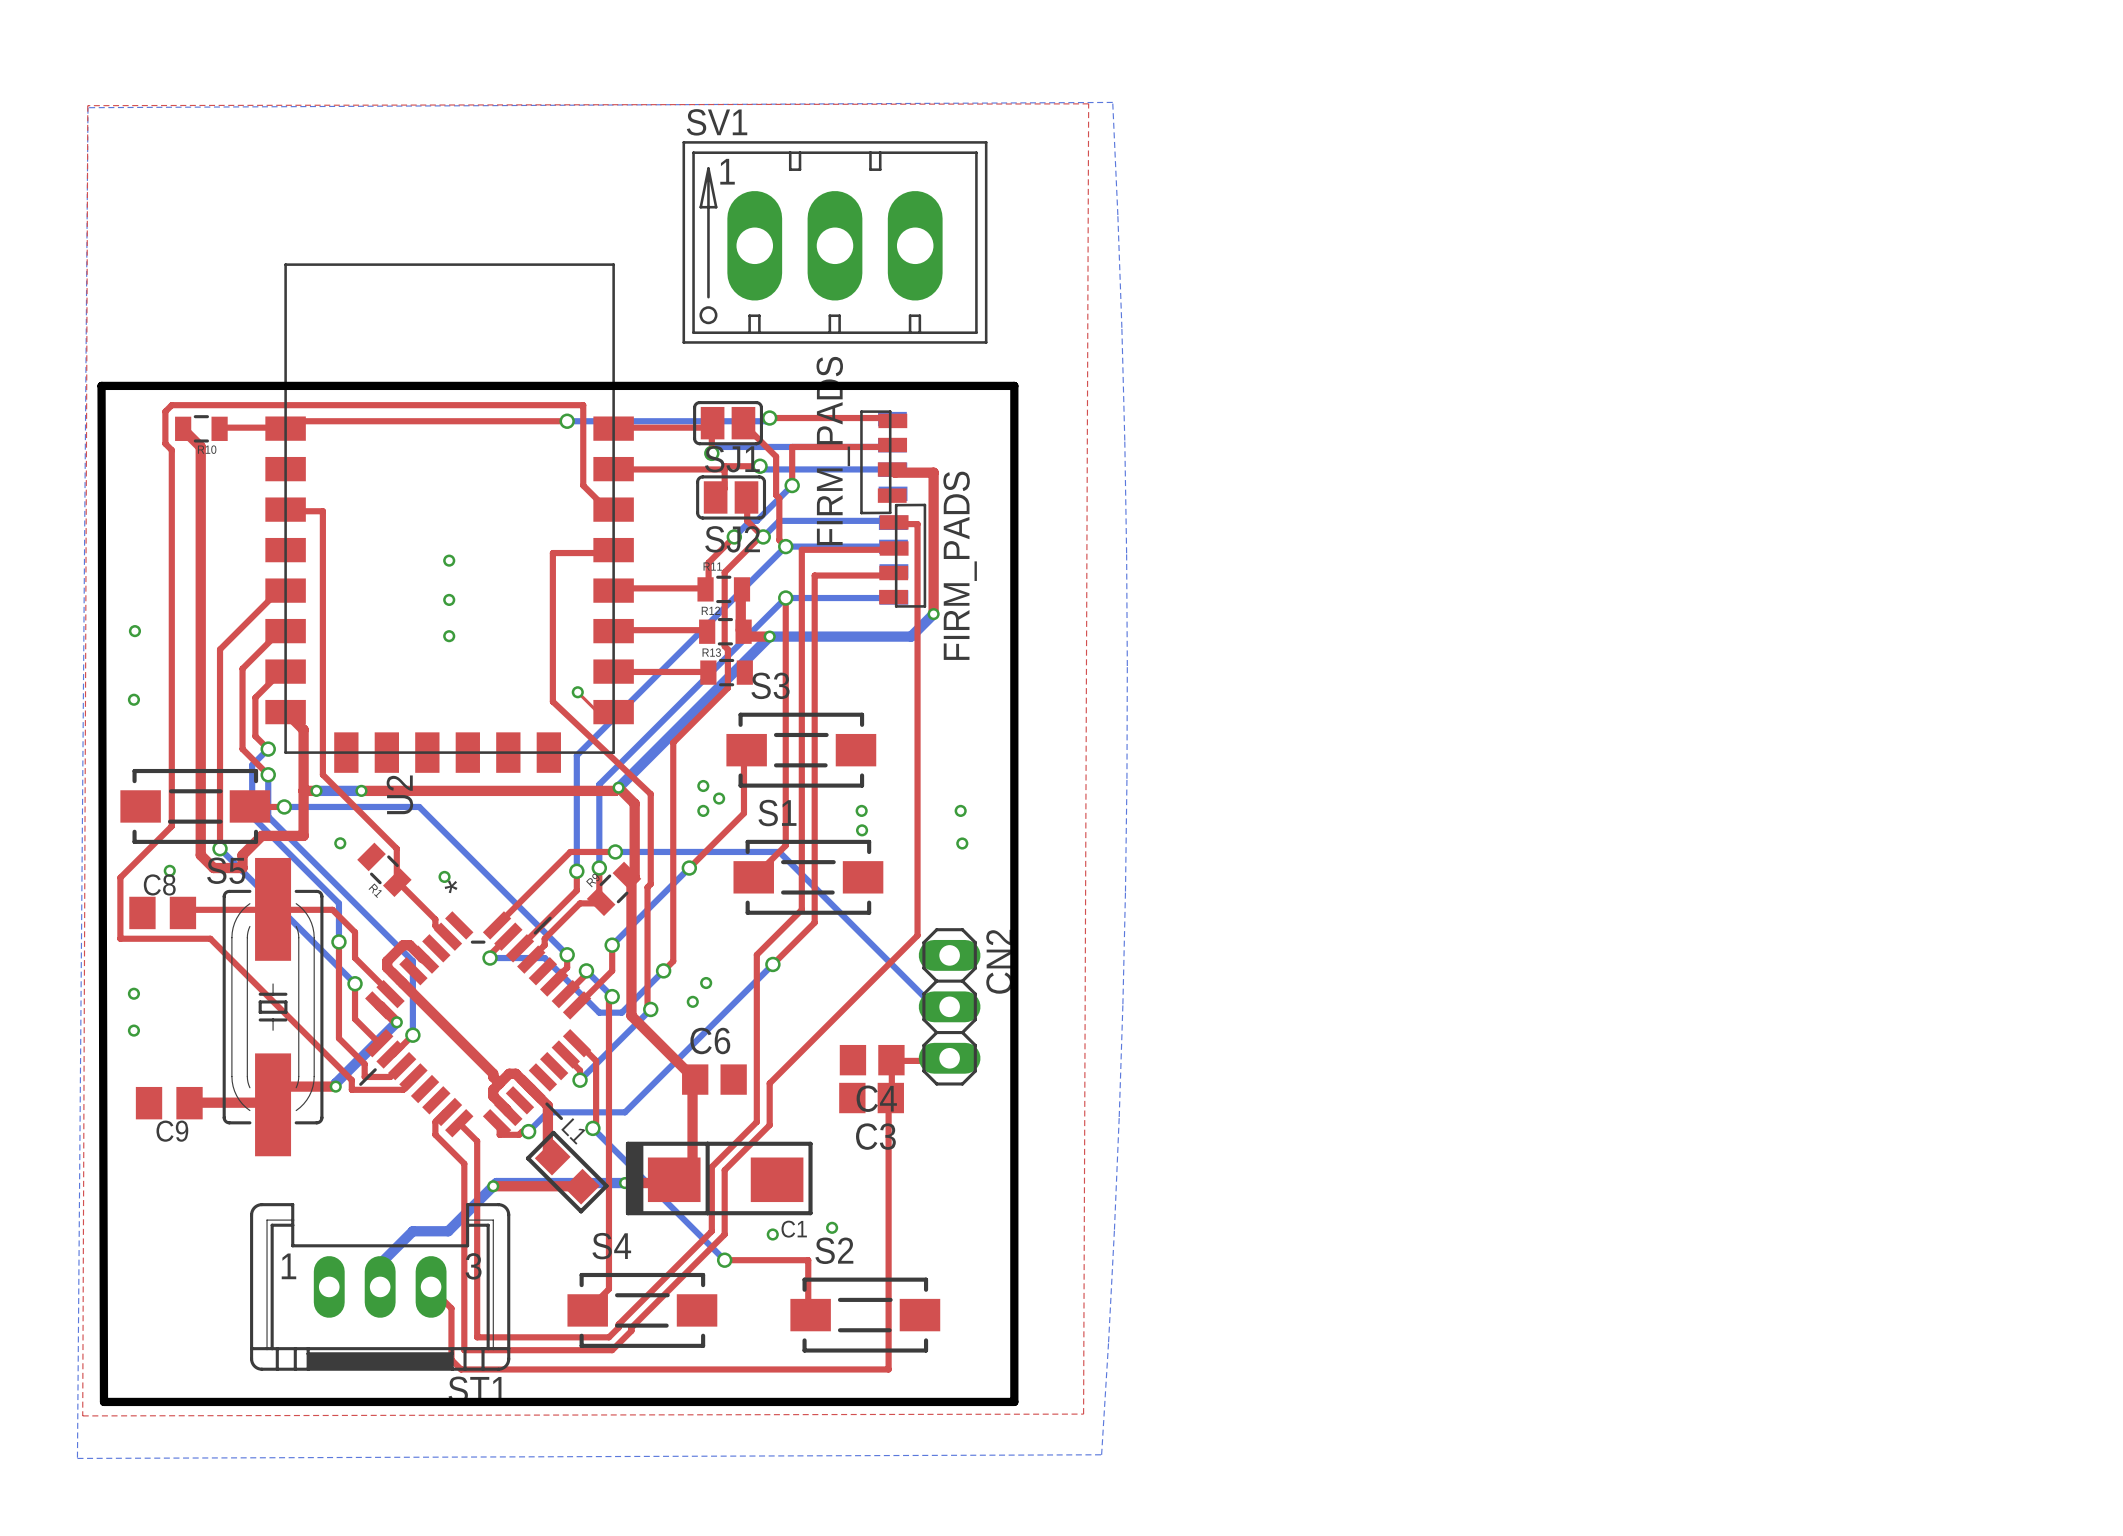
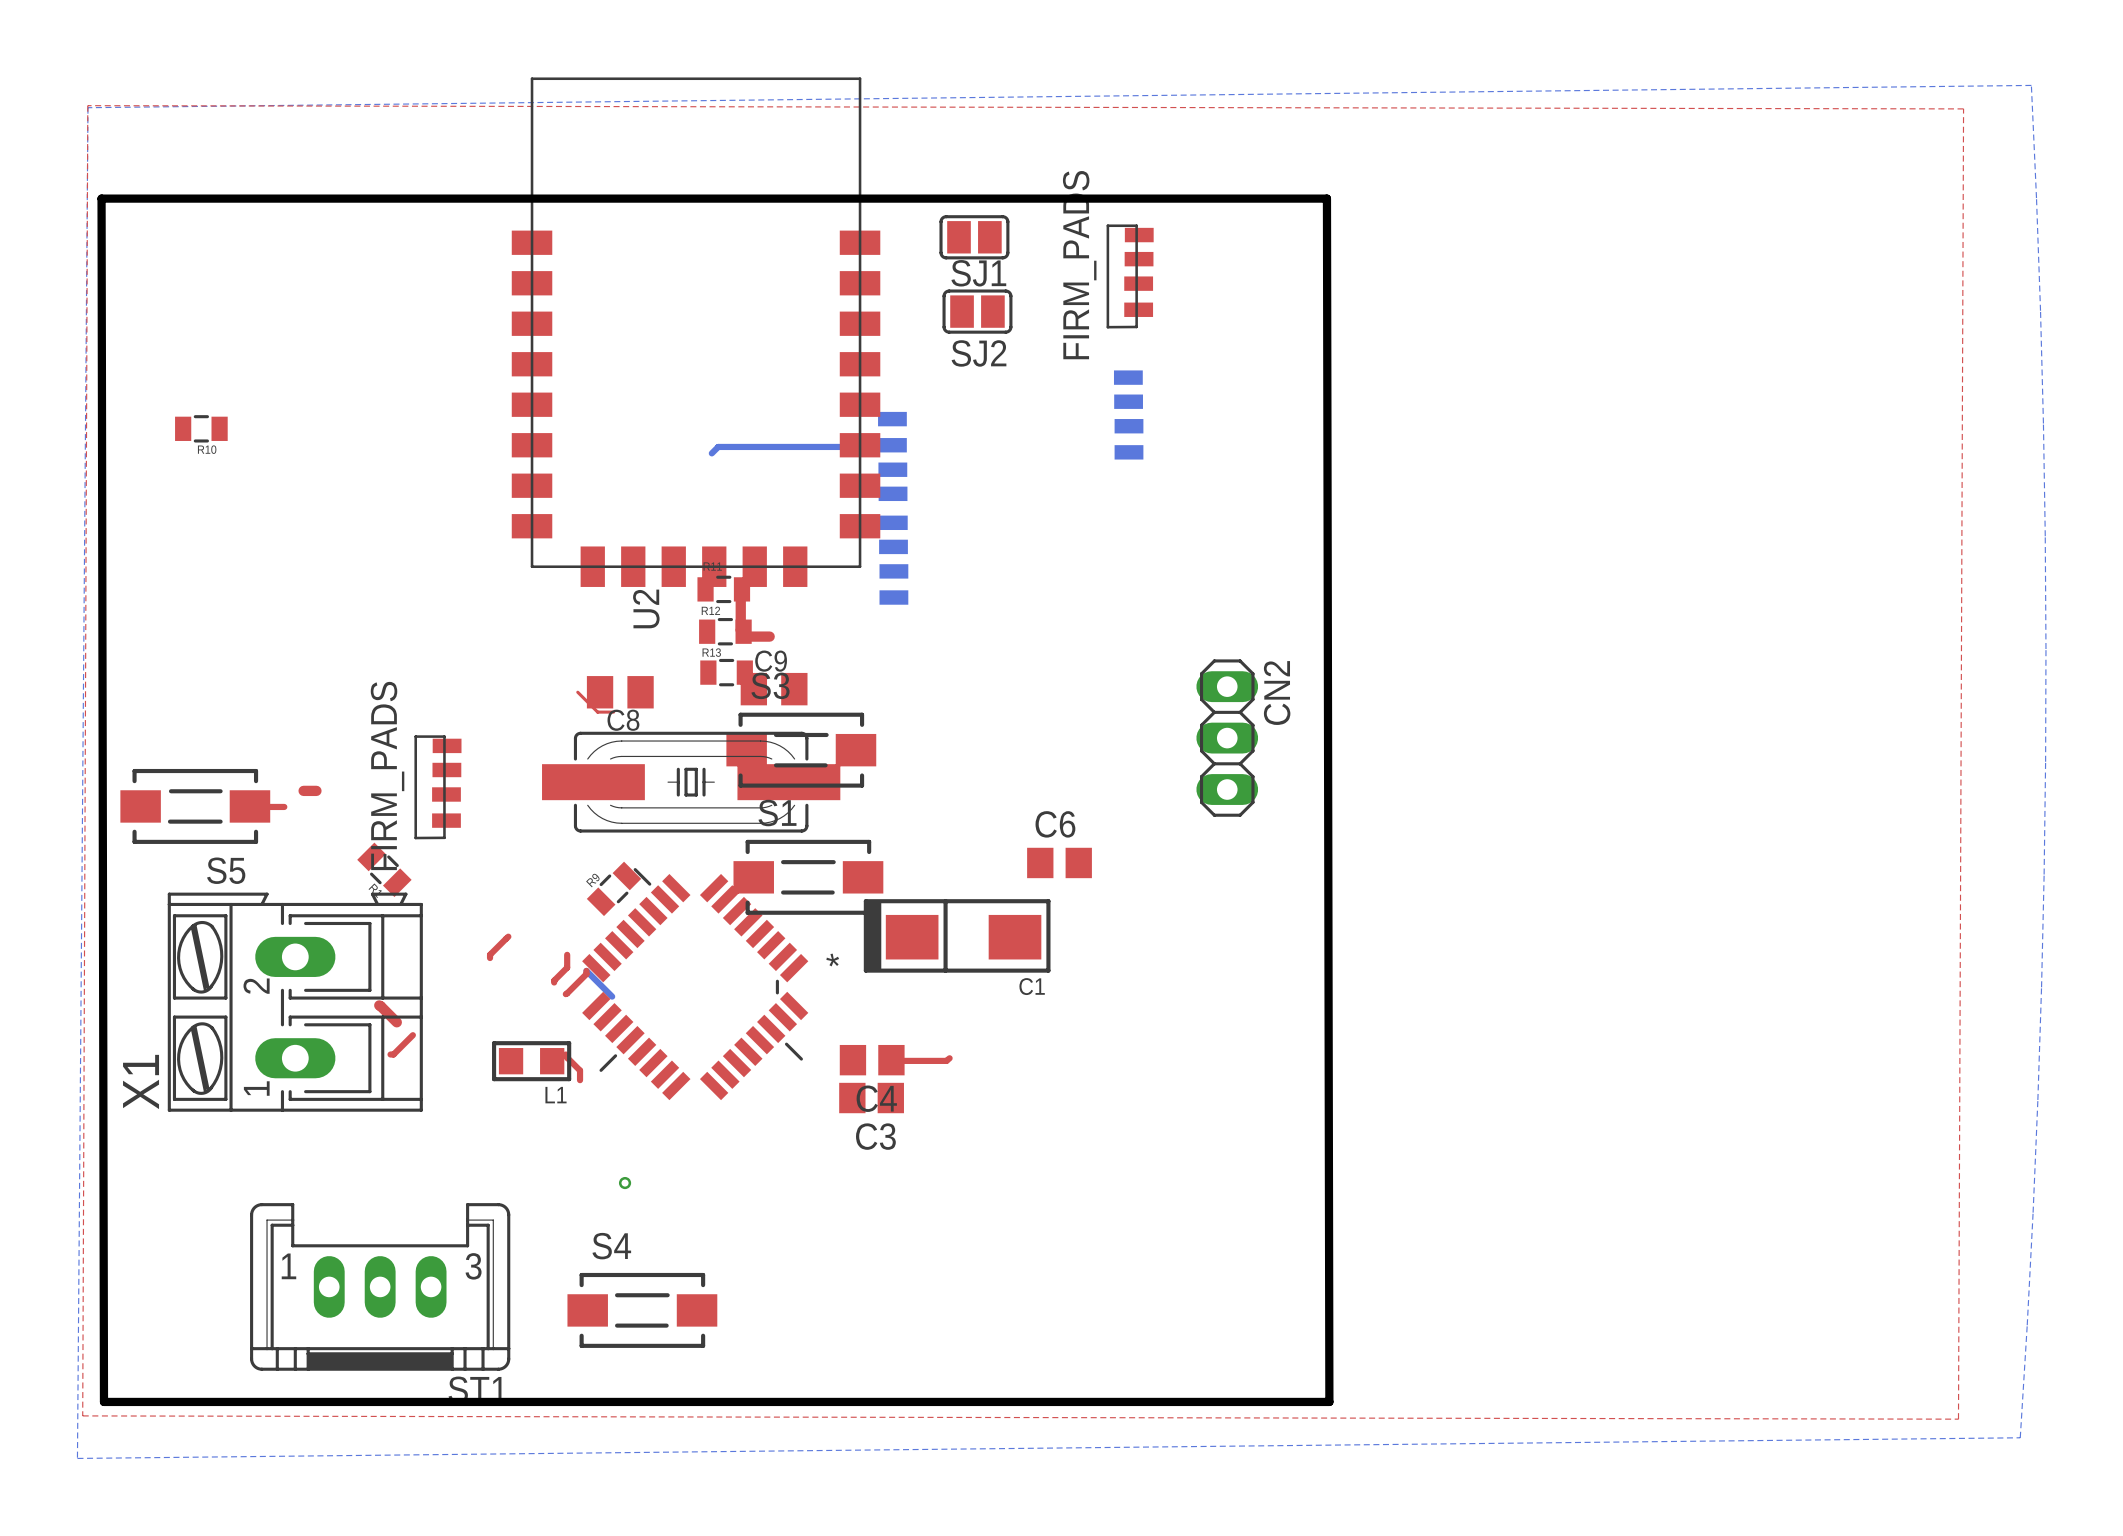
top zone outline: (87, 105) (1088, 103) (1083, 1414) (82, 1415) -> (87, 105) (1963, 108) (1958, 1419) (82, 1415)
bottom zone outline: (87, 107) (1112, 102) (1124, 440) (1126, 778) (1119, 1116) (1101, 1454) (77, 1458) -> (87, 107) (2031, 85) (2043, 423) (2045, 761) (2037, 1099) (2020, 1437) (77, 1458)
SV1: (834, 242) -> none
part: none -> (1130, 276)
part: none -> (1128, 414)
top track: (769, 418) (891, 418) (892, 420) -> none
bottom track: (769, 418) (766, 421) (567, 421) -> none
via: (769, 418) -> none
top track: (567, 421) (287, 421) (287, 427) (285, 428) (219, 428) -> none
via: (567, 421) -> none
SJ1 position: (728, 423) -> (974, 237)
top track: (743, 423) (776, 456) (776, 495) (779, 498) (779, 540) (785, 546) -> none
top track: (183, 428) (200, 446) (200, 855) (213, 868) (242, 868) (242, 855) (261, 835) (303, 835) (303, 729) (285, 712) -> none
top track: (613, 428) (615, 427) (711, 427) (712, 423) (711, 453) -> none
top track: (892, 445) (891, 446) (792, 446) (792, 485) -> none
via: (711, 453) -> none
part: (883, 462) -> none
top track: (760, 466) (724, 466) (724, 488) (715, 497) -> none
bottom track: (760, 466) (763, 469) (892, 469) -> none
via: (760, 466) -> none
top track: (613, 469) (724, 469) -> none
top track: (892, 469) (895, 472) (933, 472) (933, 614) -> none
bottom track: (792, 485) (756, 520) (750, 520) (734, 536) -> none
via: (792, 485) -> none
SJ2 position: (731, 497) -> (977, 311)
top track: (746, 497) (747, 520) (763, 536) (760, 536) (724, 572) (724, 646) (727, 649) (727, 688) (673, 742) (673, 961) (663, 970) -> none
top track: (285, 509) (287, 511) (322, 511) (322, 774) (396, 848) (397, 882) (435, 919) (435, 925) (447, 936) -> none
top track: (613, 509) (605, 508) (583, 485) (583, 405) (171, 405) (165, 411) (165, 443) (171, 450) (171, 826) (120, 877) (120, 938) (210, 938) (351, 1080) (351, 1089) (403, 1089) (413, 1077) -> none
U2 position: (449, 518) -> (696, 332)
bottom track: (893, 522) (891, 520) (779, 520) (763, 536) -> none
top track: (894, 522) (895, 524) (917, 524) (917, 935) (769, 1083) (769, 1125) (724, 1170) (724, 1234) (631, 1327) (631, 1330) (612, 1350) (464, 1350) (464, 1163) (435, 1134) (435, 1121) (445, 1112) (447, 1111) -> none
top track: (734, 536) (708, 562) (708, 588) (615, 588) (613, 590) -> none
via: (734, 536) -> none
via: (763, 536) -> none
via: (785, 546) -> none
bottom track: (893, 546) (785, 546) (576, 755) (576, 871) -> none
top track: (894, 548) (801, 549) (801, 909) (756, 954) (756, 1121) (711, 1166) (711, 1231) (618, 1324) (618, 1327) (608, 1337) (477, 1337) (477, 1141) (459, 1123) -> none
top track: (613, 550) (612, 553) (552, 553) (552, 701) (650, 794) (650, 884) (647, 887) (647, 1006) (650, 1009) -> none
part: (902, 555) -> none
via: (449, 560) -> none
top track: (893, 573) (891, 575) (814, 575) (814, 922) (772, 964) -> none
top track: (285, 590) (277, 591) (220, 649) (220, 848) -> none
bottom track: (893, 597) (785, 598) (599, 784) (599, 868) -> none
top track: (785, 598) (785, 845) (753, 877) -> none
via: (785, 598) -> none
via: (449, 599) -> none
bottom track: (933, 614) (911, 636) (769, 636) (618, 787) -> none
via: (933, 614) -> none
via: (134, 631) -> none
top track: (285, 631) (284, 633) (277, 633) (242, 668) (242, 749) (268, 774) -> none
top track: (613, 631) (705, 630) (707, 631) -> none
via: (449, 636) -> none
via: (769, 636) -> none
top track: (285, 671) (284, 668) (255, 697) (255, 736) (268, 749) -> none
top track: (613, 671) (708, 672) -> none
via: (577, 692) -> none
via: (133, 699) -> none
bottom track: (268, 749) (252, 765) (252, 816) (338, 903) (338, 941) -> none
via: (268, 749) -> none
top track: (746, 750) (743, 752) (743, 813) (689, 868) -> none
bottom track: (268, 774) (268, 816) (412, 961) (412, 1035) -> none
via: (268, 774) -> none
via: (703, 786) -> none
part: none -> (437, 787)
via: (618, 787) -> none
bottom track: (316, 790) (361, 790) -> none
via: (316, 790) -> none
top track: (361, 790) (615, 790) (618, 787) (634, 803) (634, 877) (626, 875) (631, 880) (631, 1015) (695, 1079) (692, 1083) (692, 1160) (670, 1183) (625, 1183) -> none
via: (361, 790) -> none
via: (719, 798) -> none
bottom track: (284, 806) (419, 806) (567, 954) -> none
via: (284, 806) -> none
via: (703, 810) -> none
via: (861, 810) -> none
via: (960, 810) -> none
via: (862, 830) -> none
via: (340, 843) -> none
via: (962, 843) -> none
bottom track: (220, 848) (355, 983) -> none
via: (220, 848) -> none
top track: (615, 851) (570, 851) (497, 925) -> none
bottom track: (615, 851) (779, 851) (933, 1006) (949, 1006) -> none
via: (615, 851) -> none
top track: (599, 868) (599, 900) (601, 901) (580, 903) (544, 938) (544, 945) (531, 959) -> none
via: (599, 868) -> none
bottom track: (689, 868) (612, 945) -> none
via: (689, 868) -> none
via: (169, 870) -> none
top track: (576, 871) (576, 890) (519, 948) -> none
via: (576, 871) -> none
via: (444, 876) -> none
C8 name position: C8 (159, 884) -> C8 (623, 720)
C8 position: (162, 912) -> (620, 692)
top track: (182, 912) (184, 909) (332, 909) (355, 932) (355, 958) (390, 994) -> none
top track: (338, 941) (338, 1038) (364, 1064) (364, 1076) (390, 1076) (402, 1066) -> none
via: (338, 941) -> none
top track: (612, 945) (612, 970) (577, 1005) -> none
via: (612, 945) -> none
via: (567, 954) -> none
bottom track: (490, 958) (544, 958) (599, 1012) (621, 1012) (663, 970) -> none
via: (490, 958) -> none
top track: (425, 959) (409, 945) (403, 945) (387, 961) (387, 967) (493, 1073) (493, 1076) (499, 1083) -> none
bottom track: (772, 964) (625, 1112) (547, 1112) (528, 1131) -> none
via: (772, 964) -> none
via: (586, 970) -> none
via: (663, 970) -> none
top track: (355, 983) (355, 1019) (379, 1043) -> none
via: (355, 983) -> none
via: (706, 983) -> none
via: (133, 993) -> none
top track: (612, 996) (608, 999) (608, 1289) (587, 1310) -> none
via: (612, 996) -> none
via: (692, 1001) -> none
X1: none -> (295, 1002)
CN2 position: (949, 1006) -> (1227, 738)
part rotation: 0° (273, 1007) -> 90° clockwise (691, 782)
part position: (273, 1007) -> (691, 782)
bottom track: (650, 1009) (580, 1080) -> none
via: (650, 1009) -> none
bottom track: (396, 1022) (335, 1083) (335, 1086) -> none
via: (396, 1022) -> none
part rotation: 0° (475, 1024) -> 90° clockwise (695, 984)
part position: (475, 1024) -> (695, 984)
via: (133, 1030) -> none
via: (412, 1035) -> none
top track: (577, 1043) (596, 1060) (596, 1125) (592, 1128) -> none
top track: (891, 1060) (891, 1096) (888, 1099) (888, 1369) (461, 1369) (451, 1359) (451, 1308) (431, 1286) -> none
C6 position: (714, 1079) -> (1059, 862)
via: (580, 1080) -> none
top track: (335, 1086) (274, 1086) (273, 1104) (268, 1102) (189, 1103) -> none
via: (335, 1086) -> none
C9 position: (169, 1103) -> (774, 689)
top track: (508, 1111) (493, 1096) (493, 1089) (509, 1073) (515, 1073) (547, 1105) (547, 1154) (552, 1157) -> none
top track: (497, 1123) (499, 1125) (499, 1134) (518, 1134) (522, 1131) (528, 1131) -> none
bottom track: (592, 1128) (724, 1260) -> none
via: (592, 1128) -> none
C9 name position: C9 (172, 1131) -> C9 (771, 661)
via: (528, 1131) -> none
L1 name position: L1 (573, 1131) -> L1 (556, 1095)
L1 rotation: 0° (567, 1172) -> 45° counterclockwise (531, 1061)
L1 position: (567, 1172) -> (531, 1061)
C1 position: (719, 1178) -> (957, 935)
bottom track: (625, 1183) (496, 1183) (448, 1231) (412, 1231) (380, 1263) (380, 1286) -> none
top track: (493, 1186) (581, 1186) -> none
via: (493, 1186) -> none
via: (832, 1227) -> none
via: (772, 1234) -> none
top track: (724, 1260) (808, 1260) (808, 1314) (810, 1315) -> none
via: (724, 1260) -> none
S2: (865, 1315) -> none
board edge: (103, 1401) (101, 385) (1014, 385) (1014, 1401) -> (103, 1401) (101, 198) (1326, 198) (1329, 1401) (1014, 1401)

